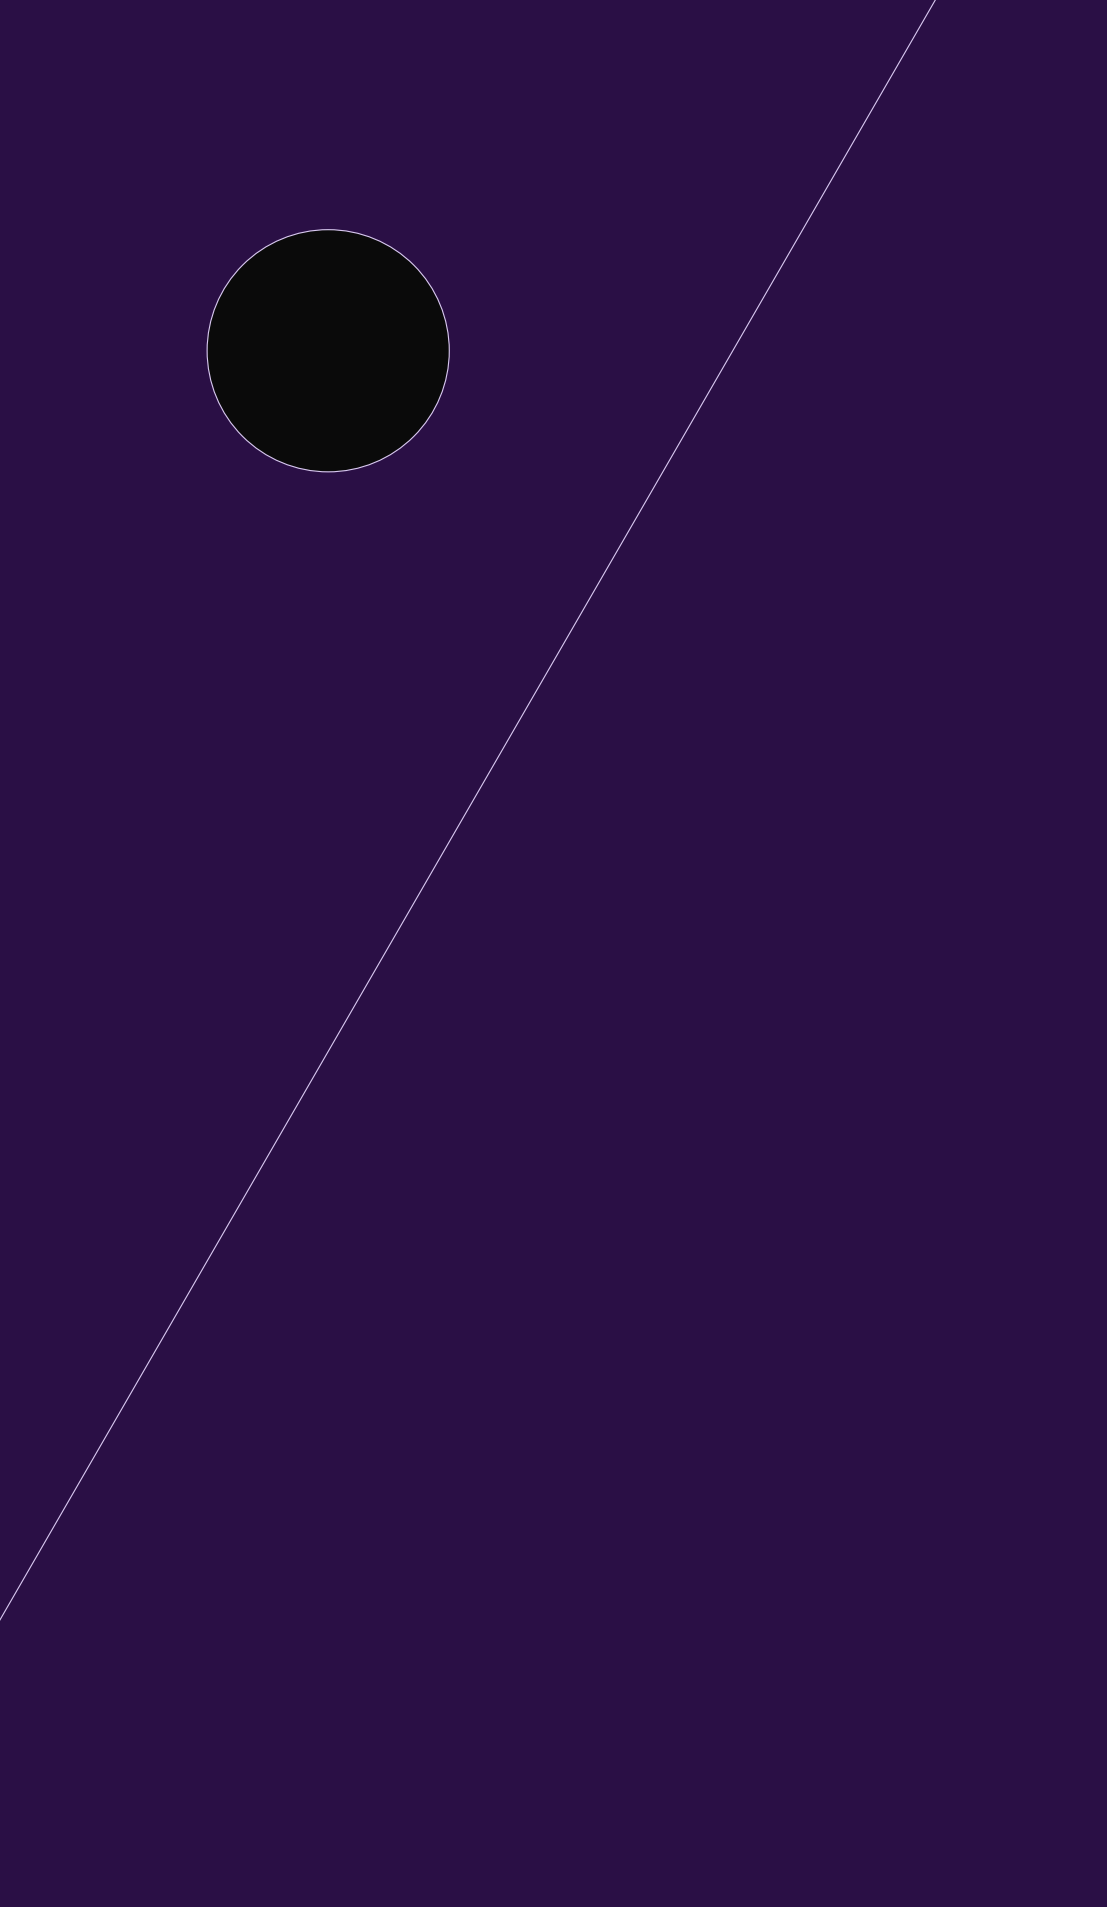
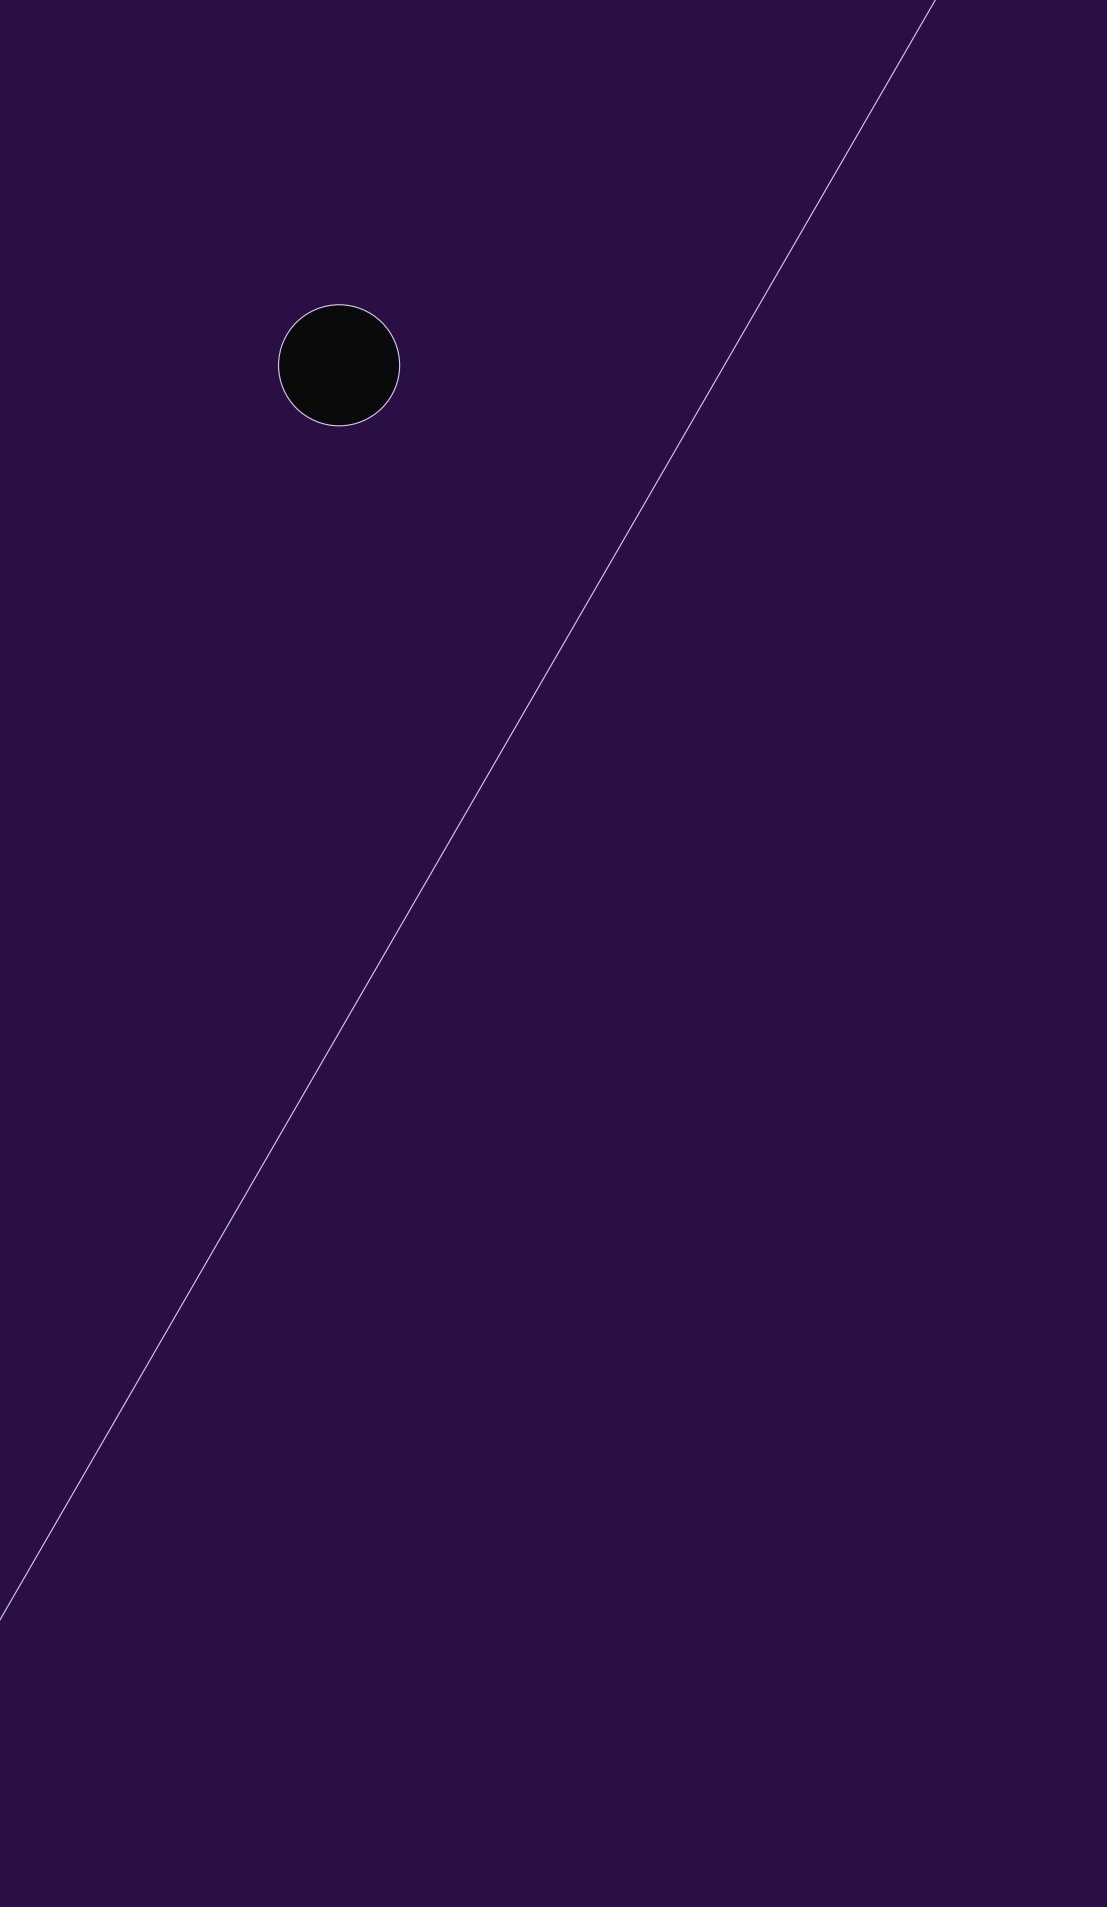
hole size: [207, 229, 450, 472] -> [278, 304, 400, 426]

